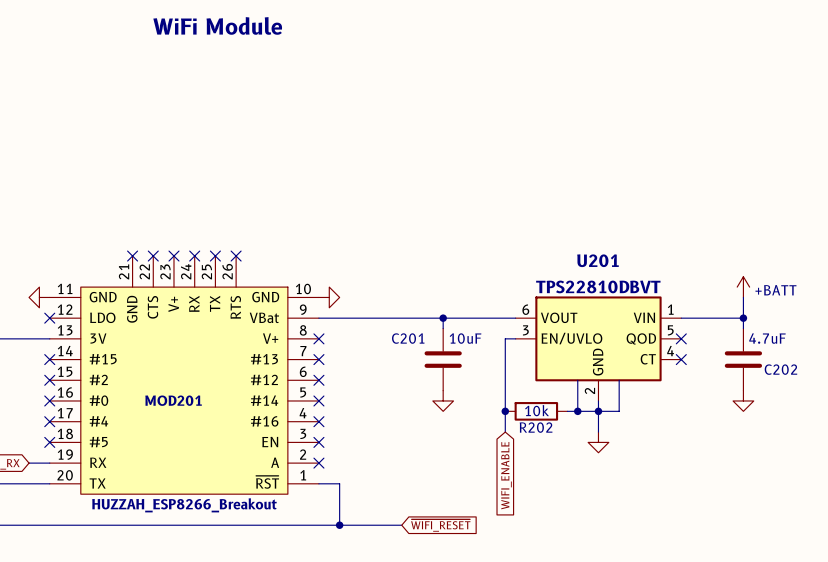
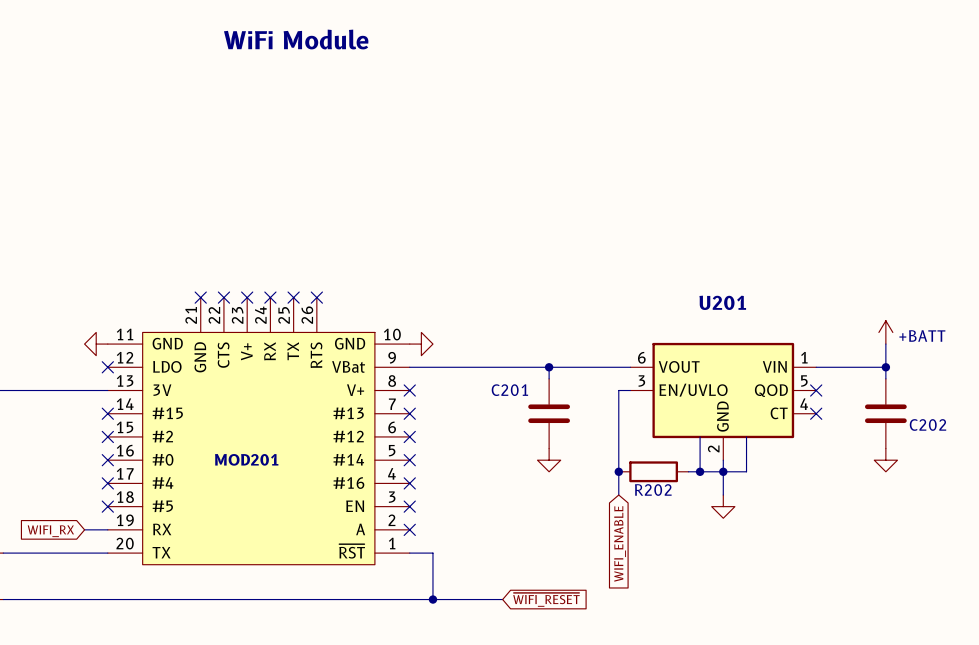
U201 value: TPS22810DBVT (598, 286) -> none
C201 value: 10uF (465, 338) -> none
C202 value: 4.7uF (767, 338) -> none
R202 value: 10k (537, 410) -> none
MOD201 value: HUZZAH_ESP8266_Breakout (184, 505) -> none

